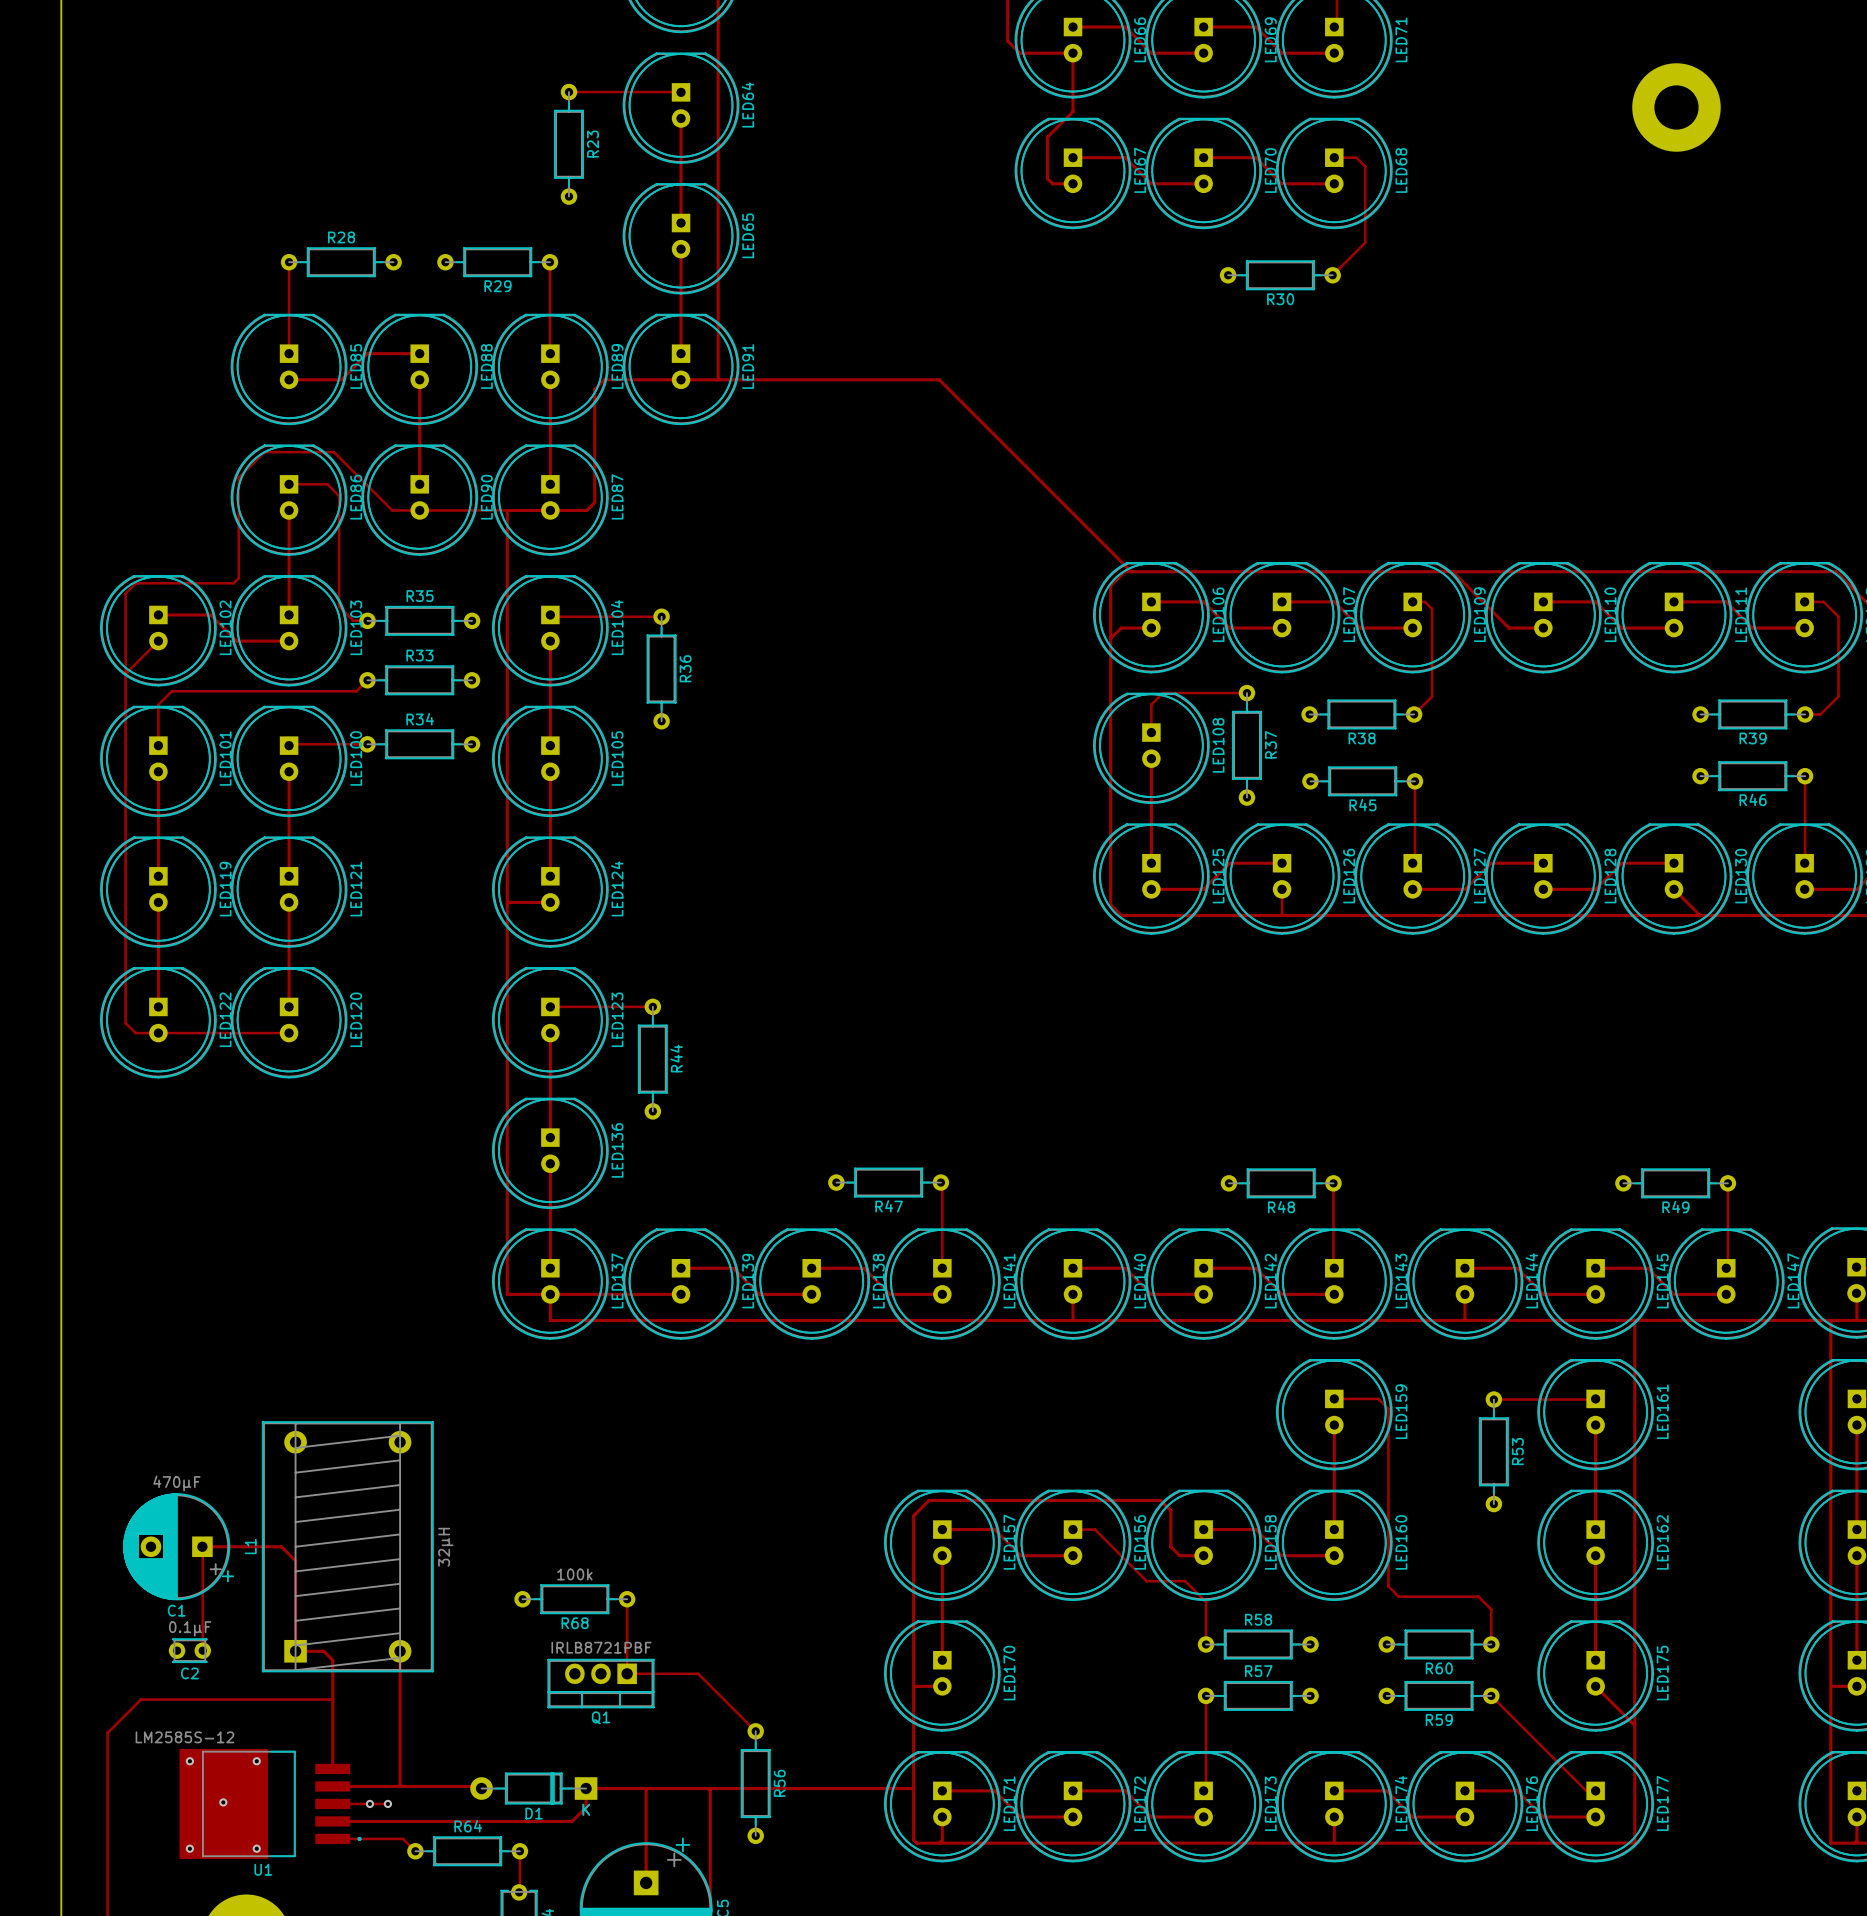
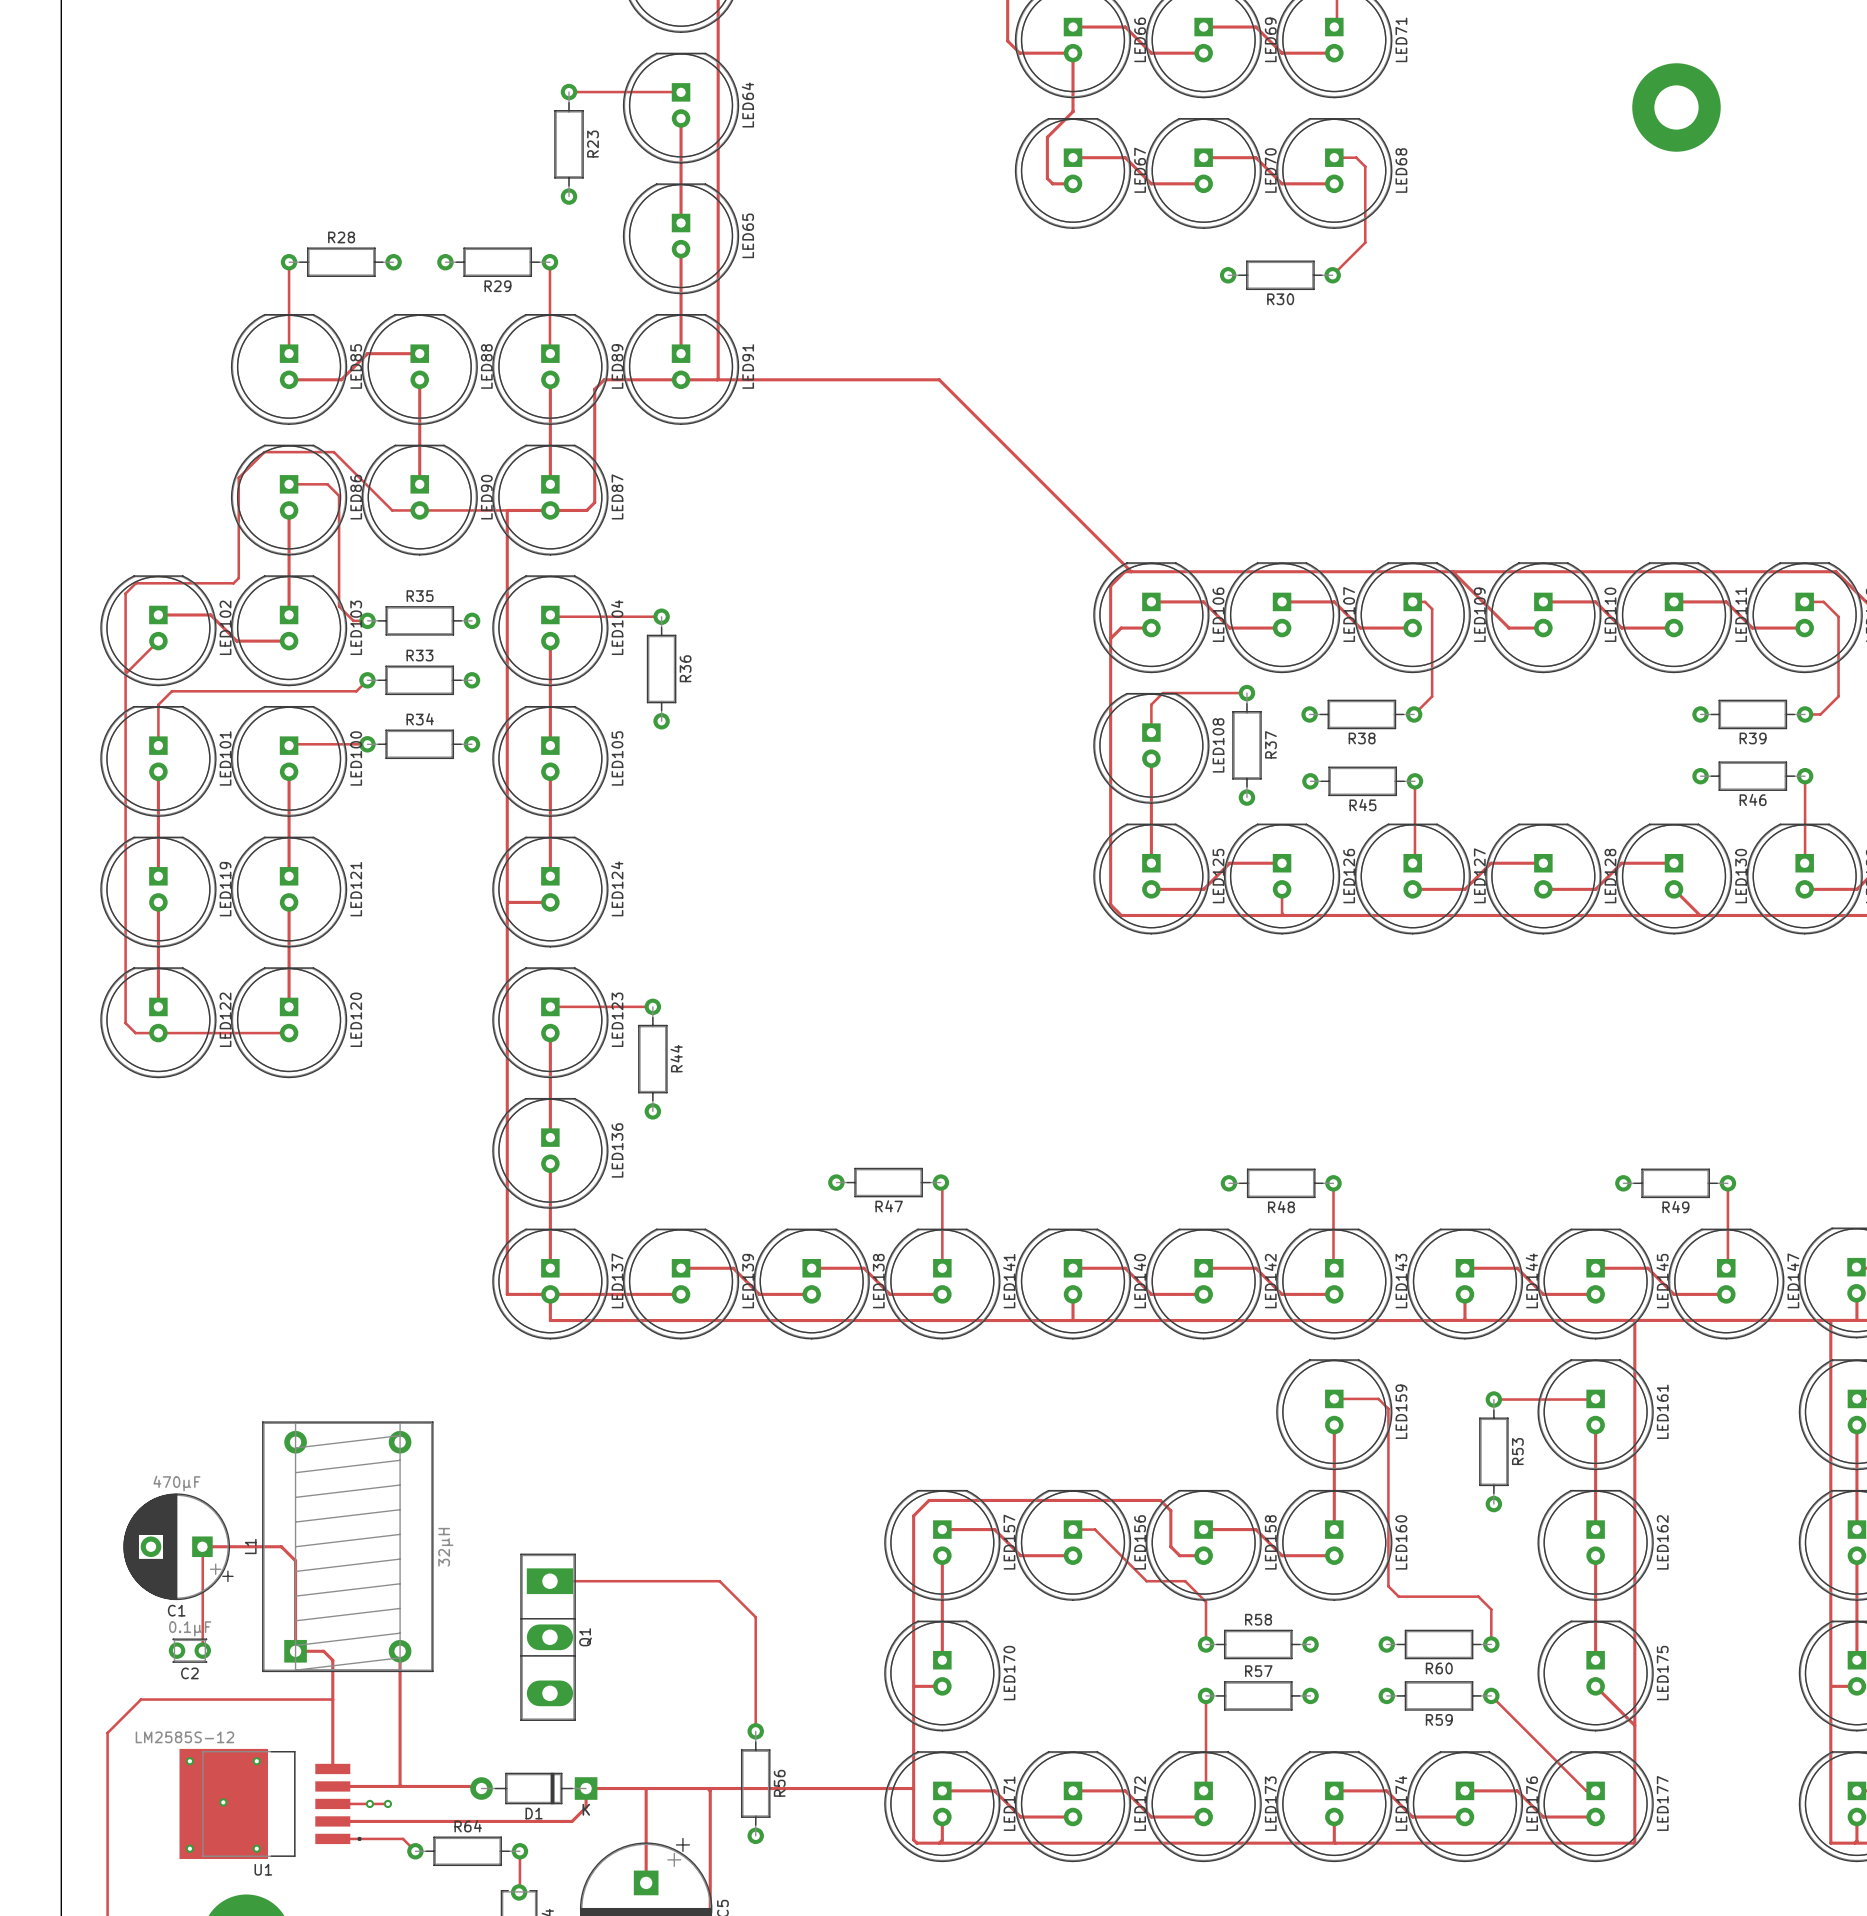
R68: 100k (574, 1599) -> none
track: (627, 1599) (627, 1673) (698, 1673) (755, 1731) -> (549, 1581) (719, 1581) (755, 1617) (755, 1731)
Q1 value: IRLB8721PBF (601, 1647) -> none
Q1 footprint: [547, 1659, 655, 1709] -> [520, 1553, 576, 1721]
Q1 name position: Q1 (601, 1717) -> Q1 (585, 1637)

